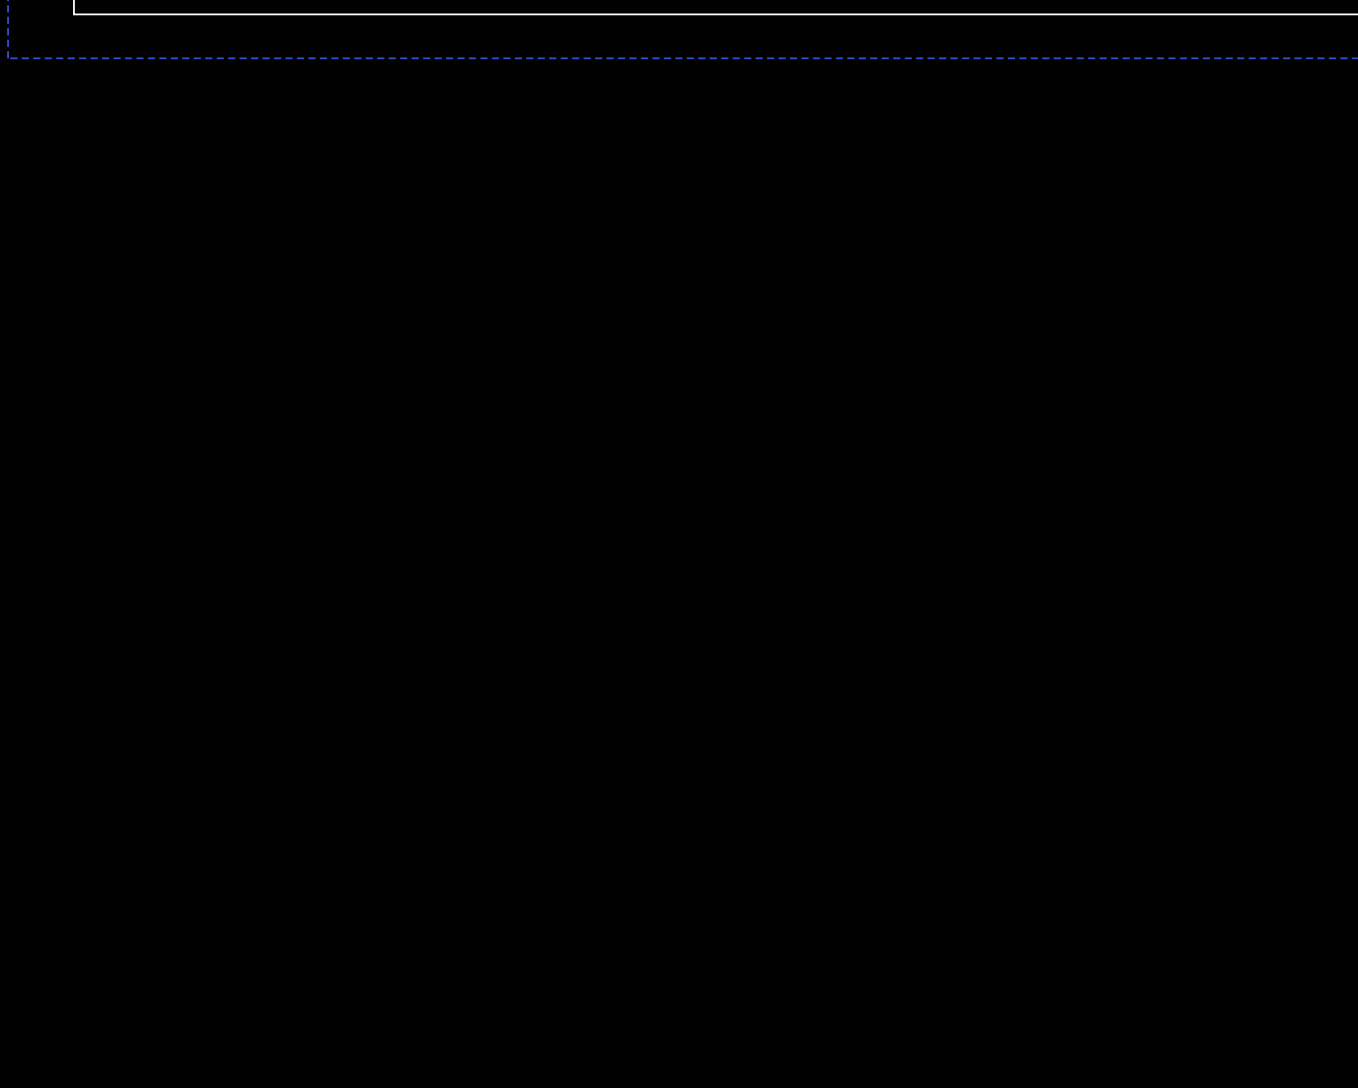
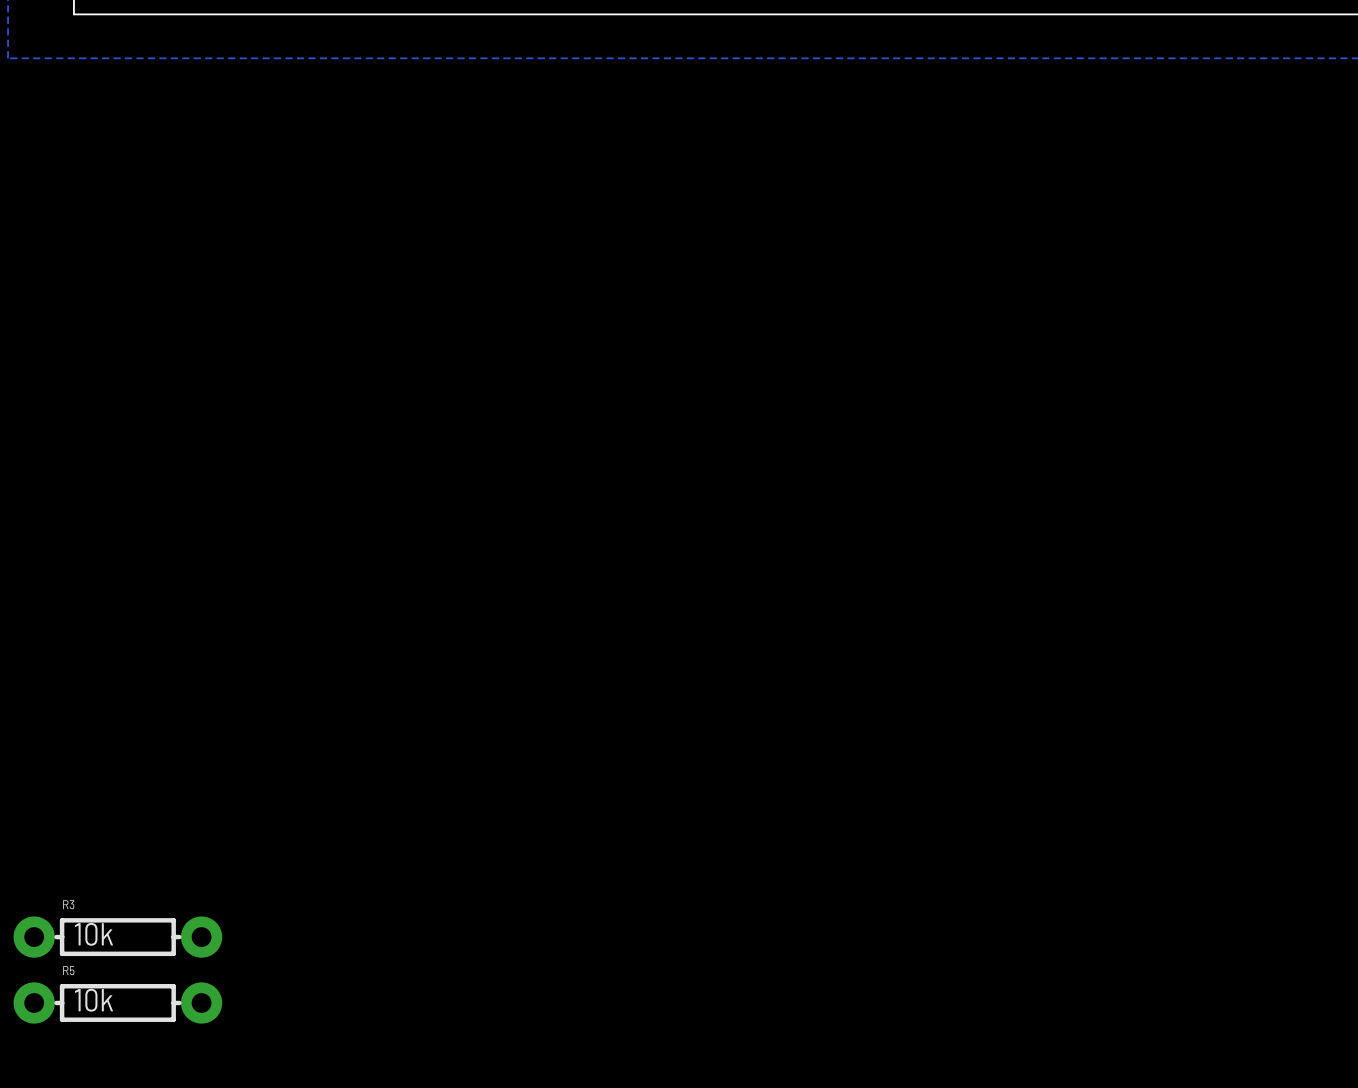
R3: none -> 10k (117, 937)
R5: none -> 10k (117, 1002)

